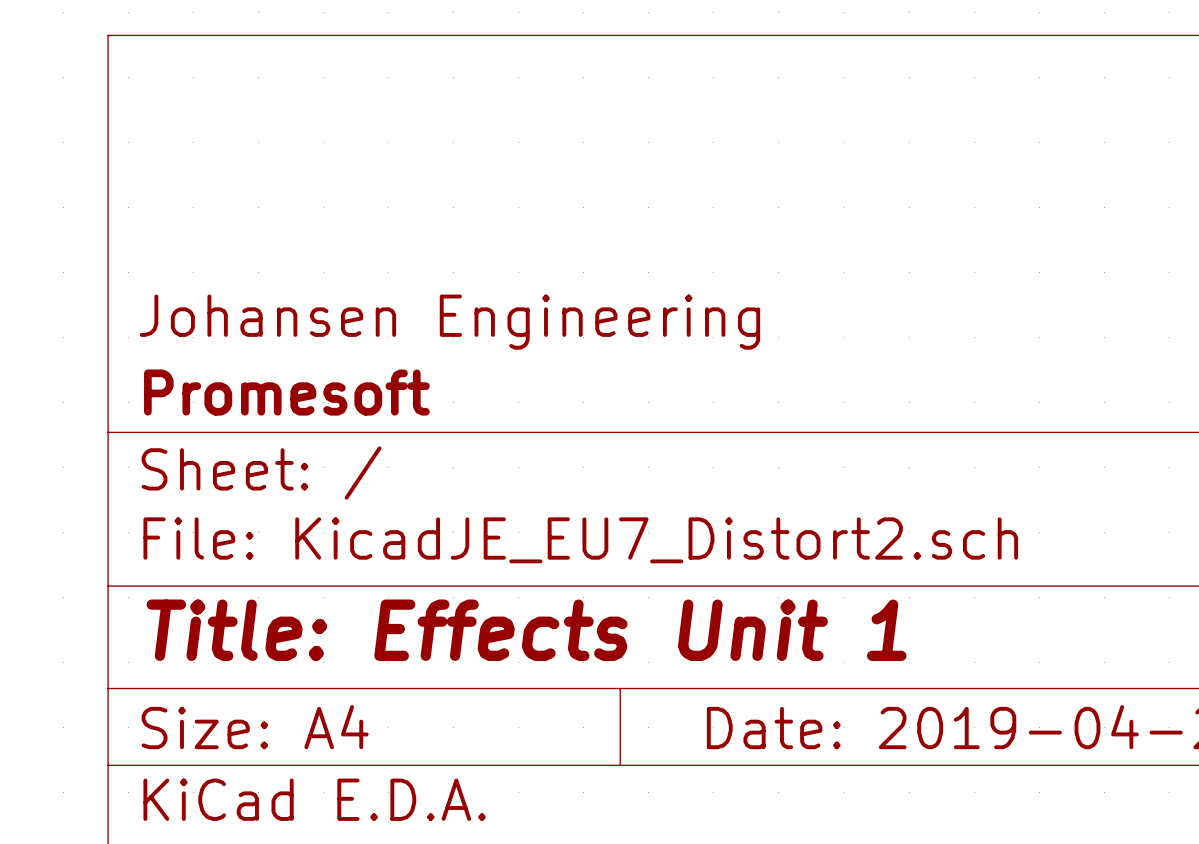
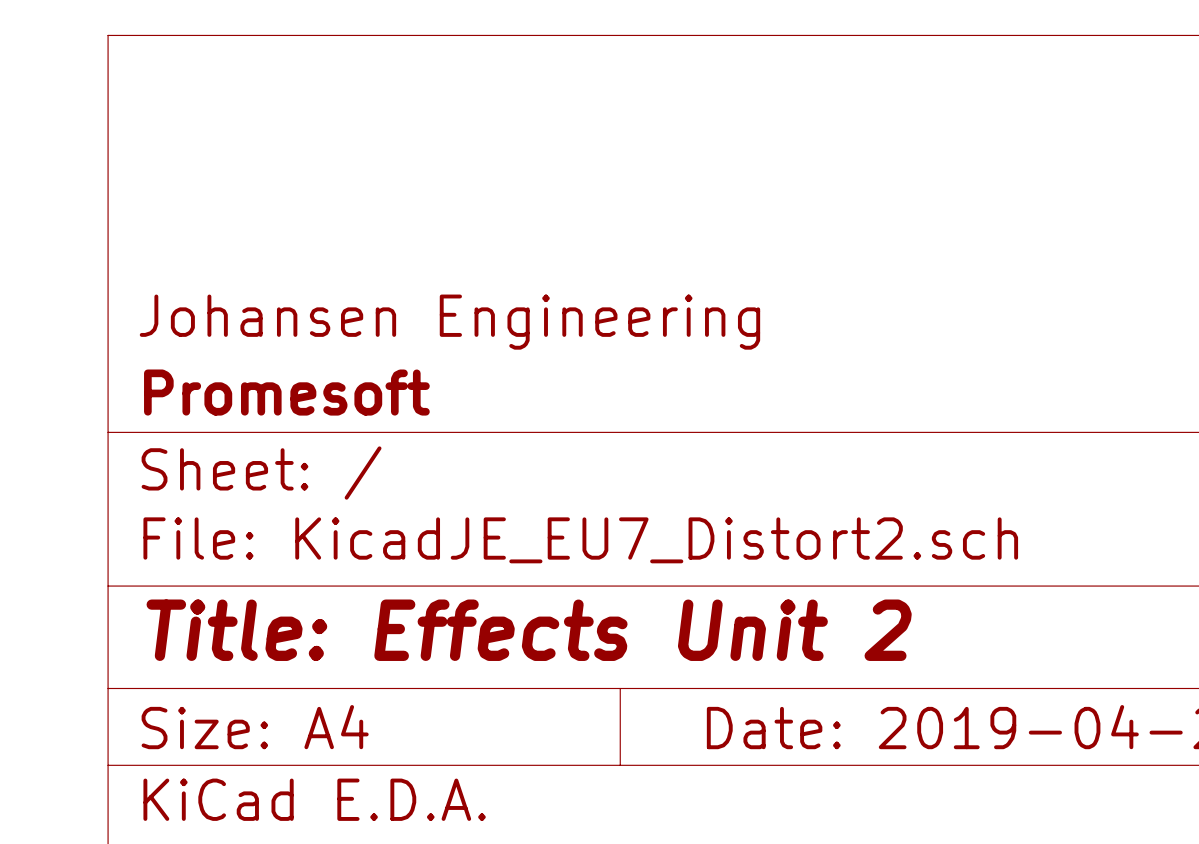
title block: Title: Effects Unit 1 (526, 630) -> Title: Effects Unit 2 (529, 630)

